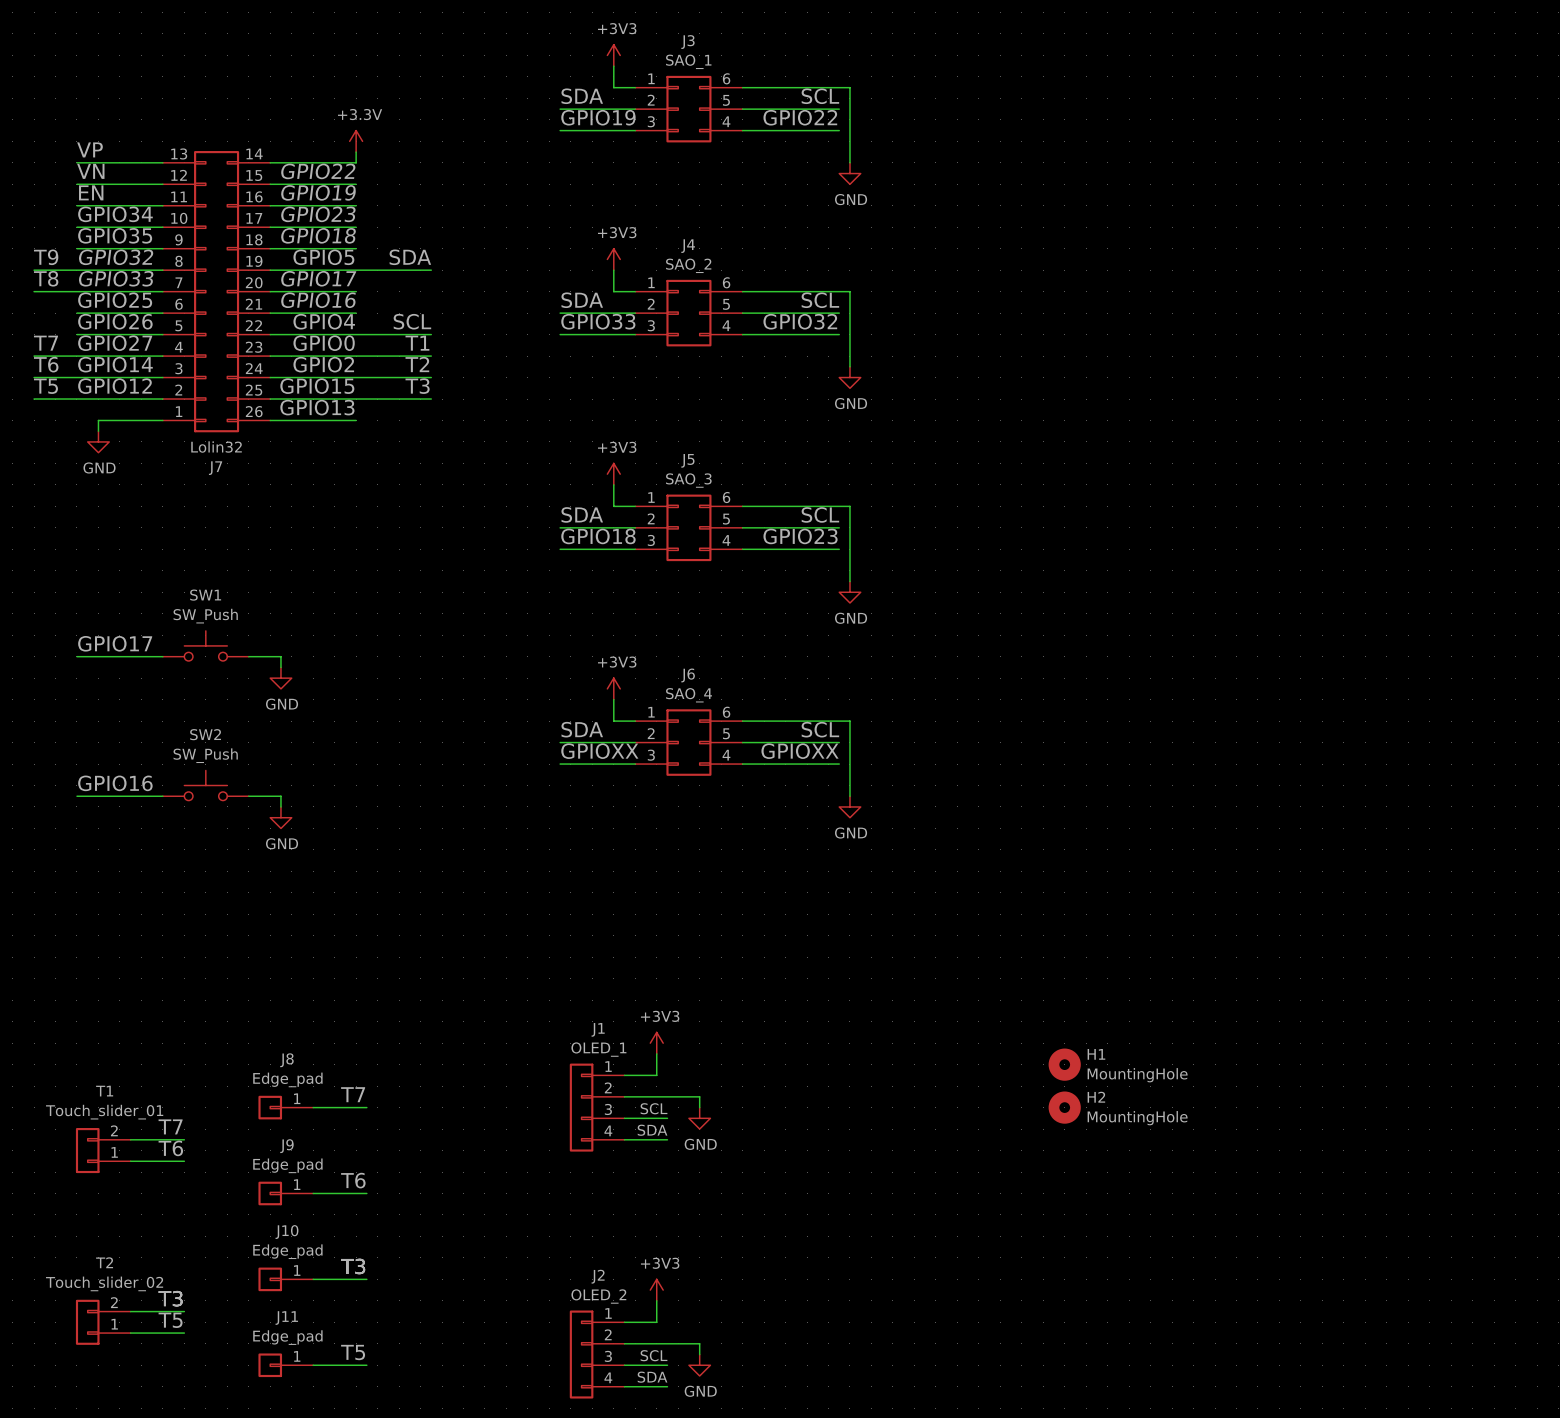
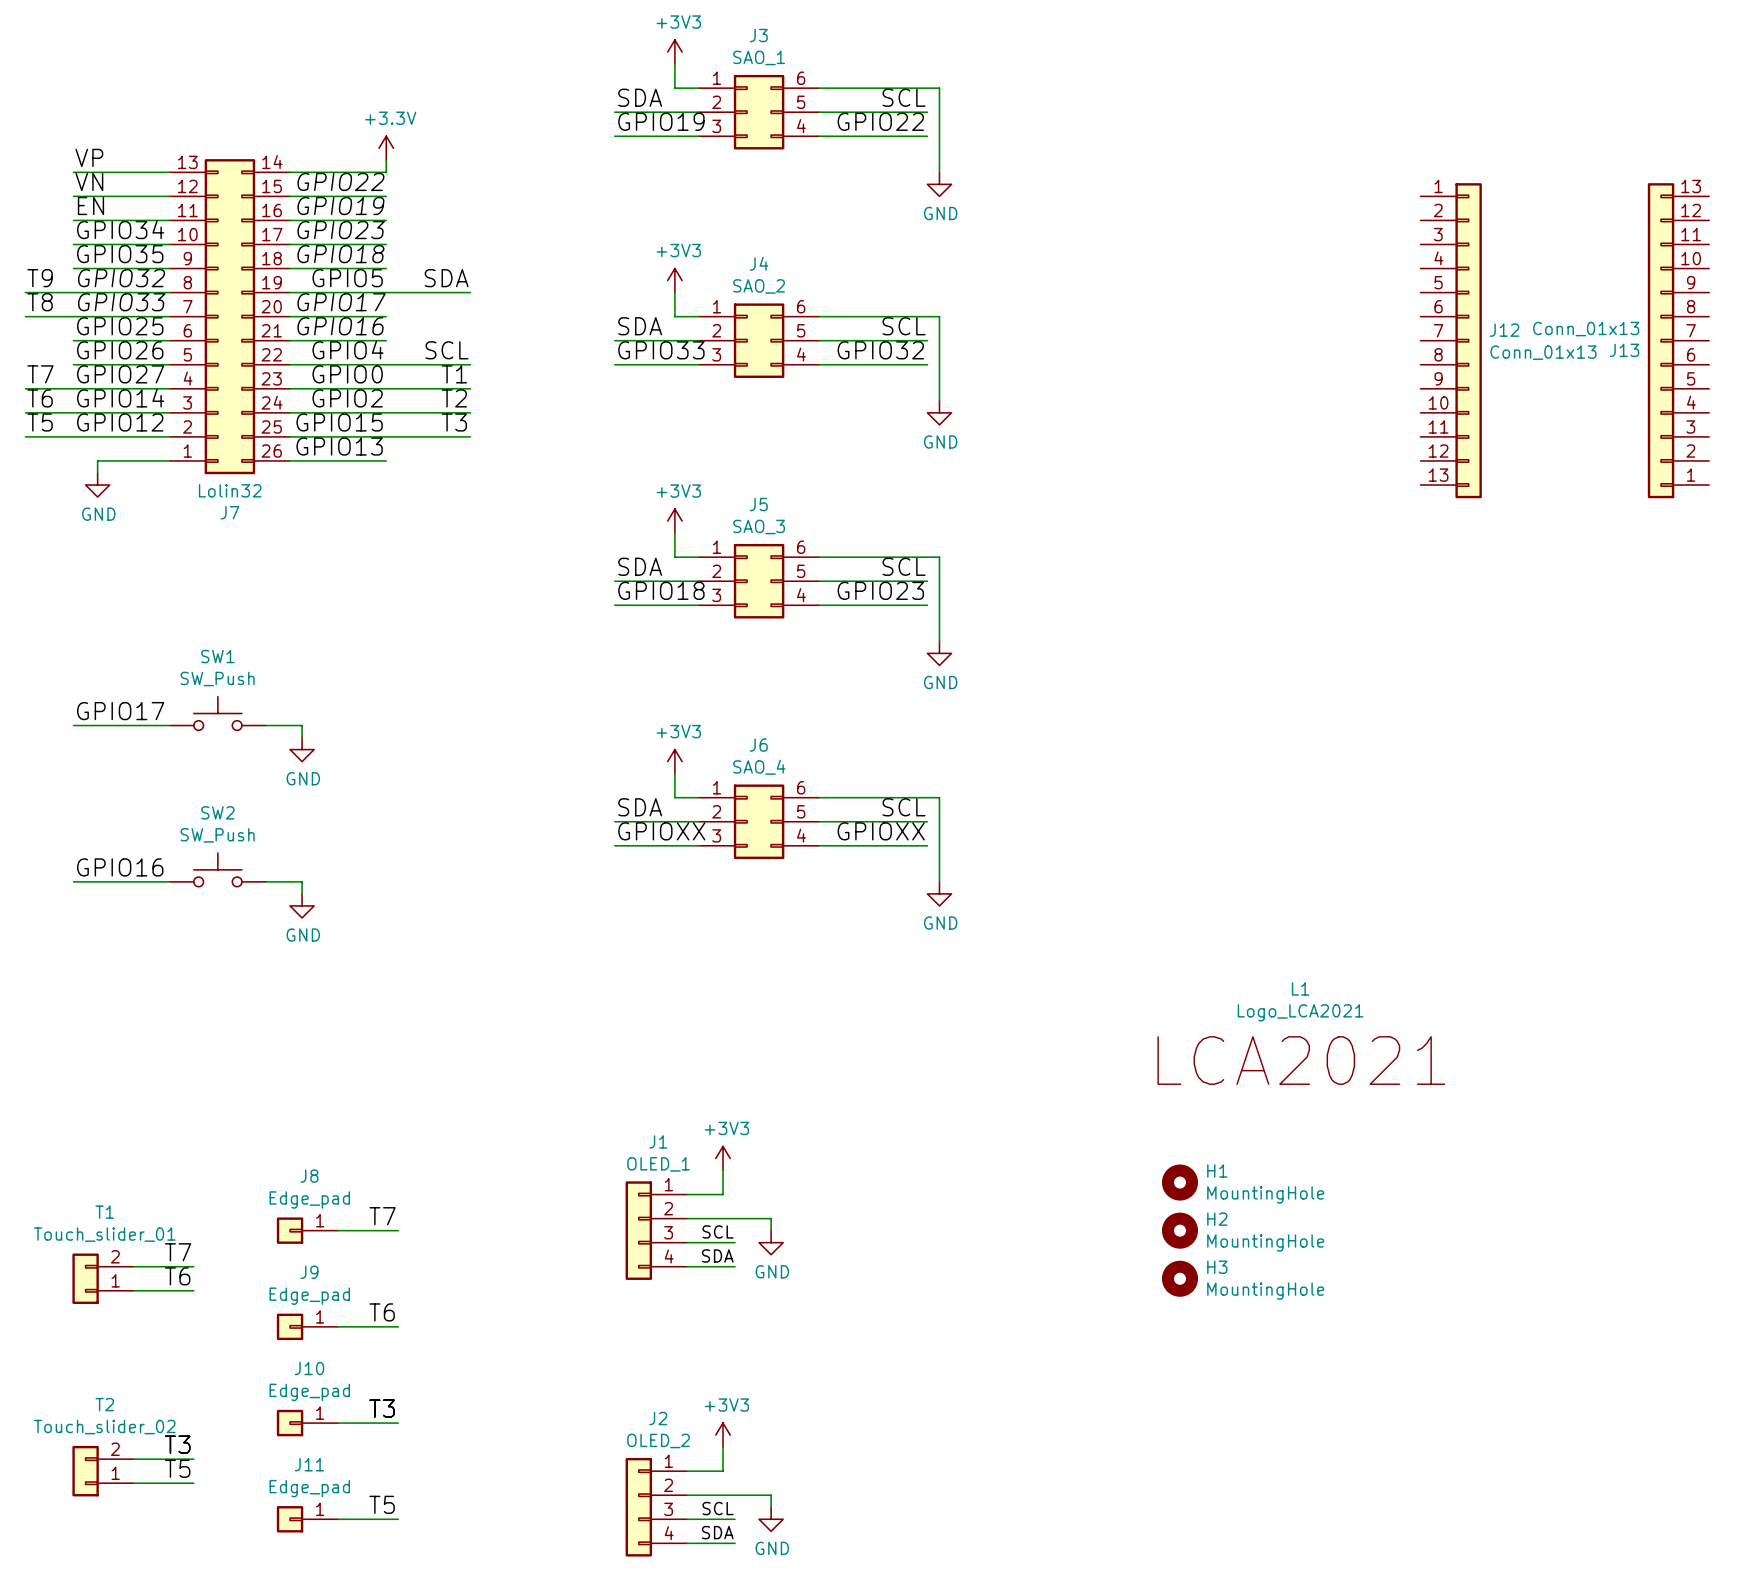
J12: none -> Conn_01x13 (1451, 340)
J13: none -> Conn_01x13 (1678, 340)
L1: none -> Logo_LCA2021 (1301, 1033)
H3: none -> MountingHole (1180, 1278)

